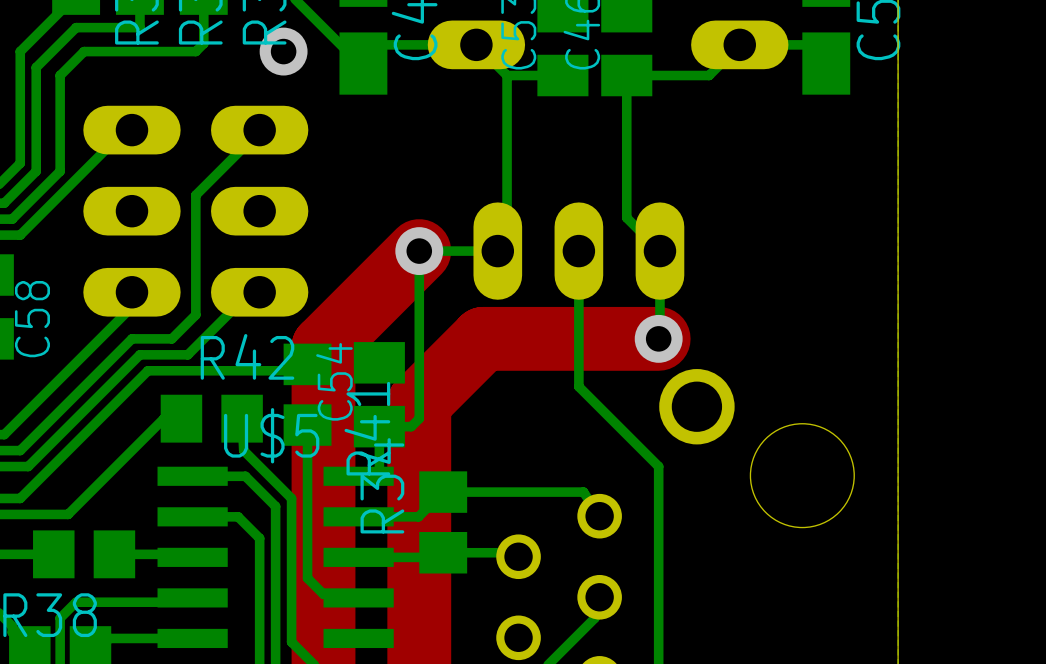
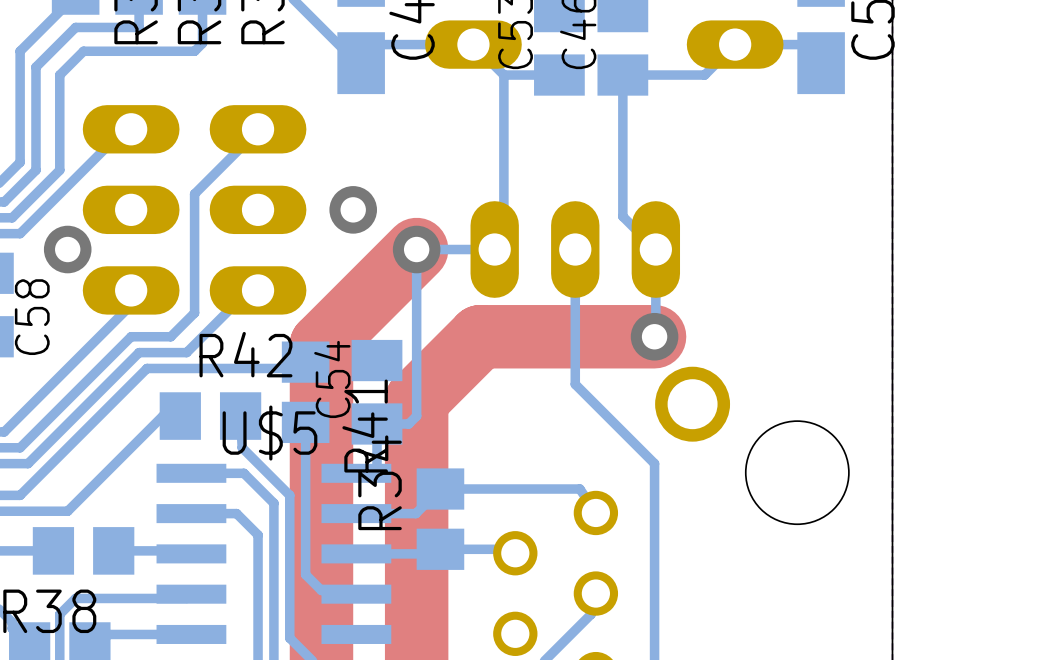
via: (283, 51) -> none
via: none -> (353, 209)
via: none -> (67, 249)

